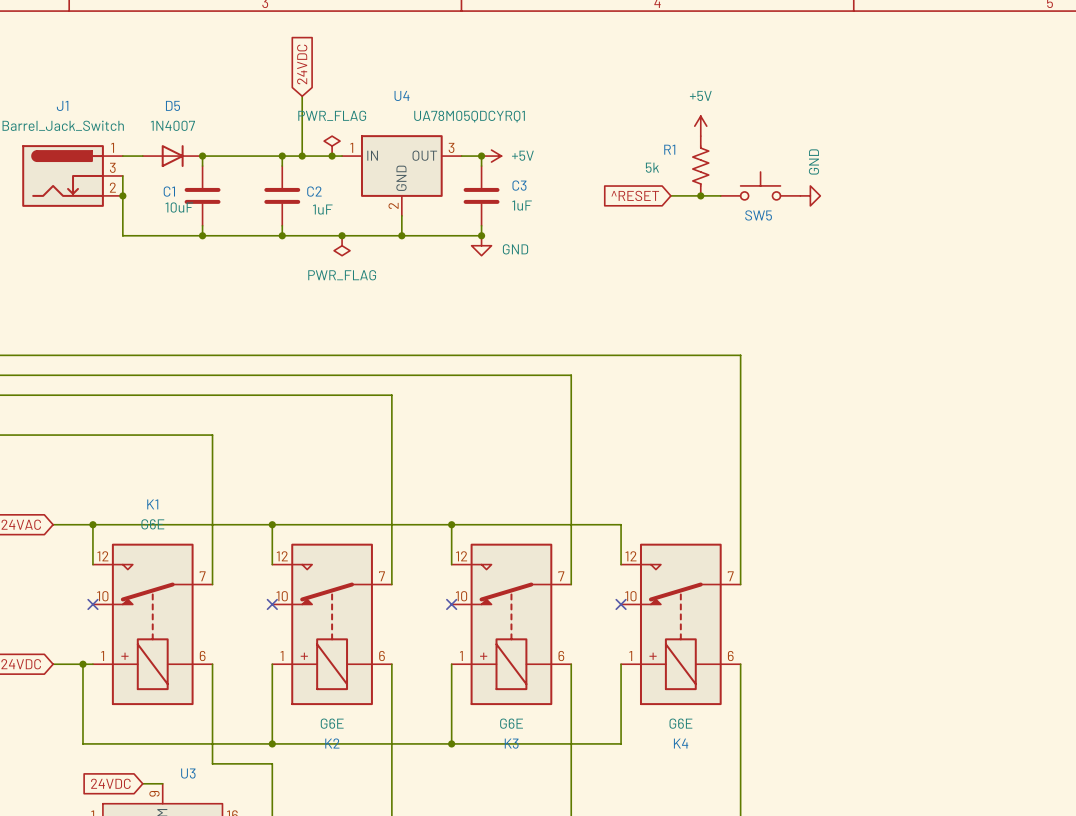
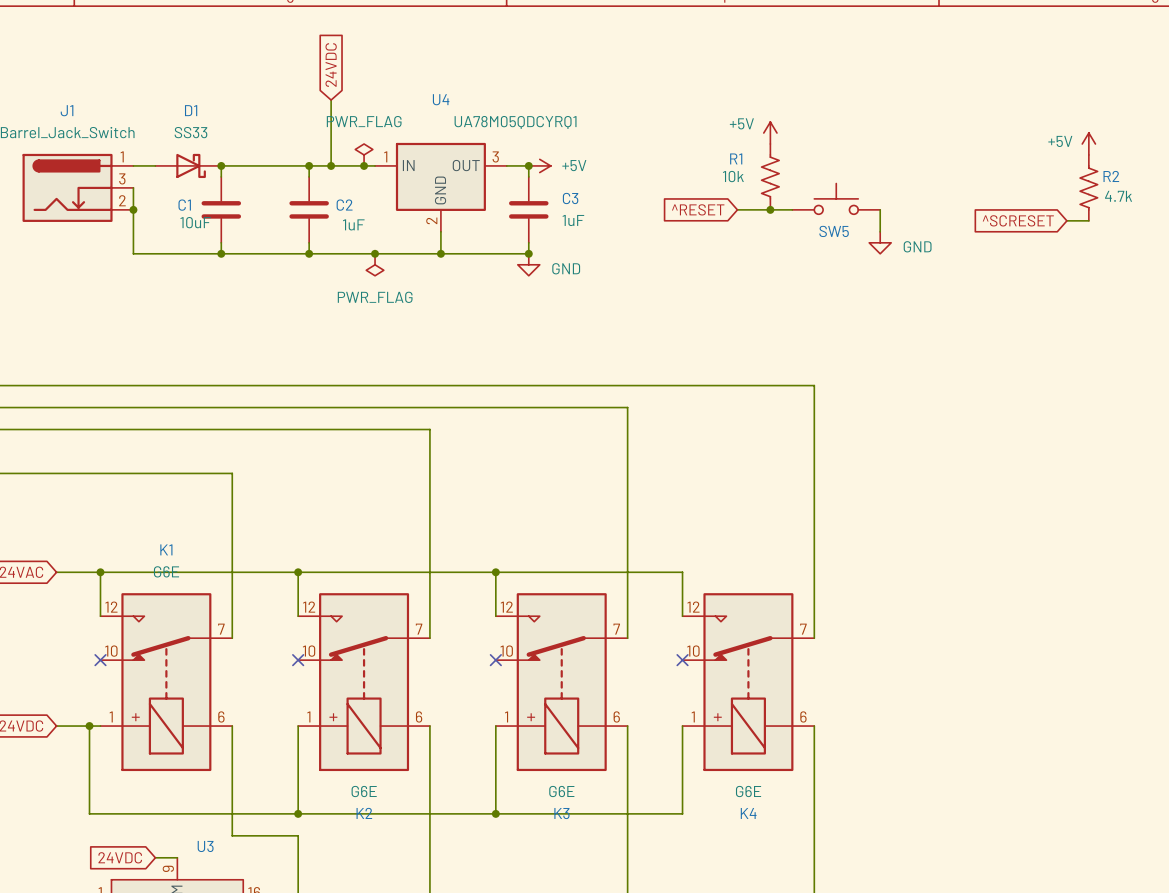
power symbol text position: +5V (700, 95) -> +5V (741, 123)
power symbol: none -> +5V (1088, 143)
D5: 1N4007 (172, 156) -> none
D1: none -> SS33 (188, 165)
R1 value: 5k (652, 167) -> 10k (733, 176)
R2: none -> 4.7k (1088, 187)
wire: none -> (880, 209) (880, 231)
power symbol rotation: 0° (810, 195) -> 90° clockwise (880, 242)
power symbol position: GND (810, 195) -> GND (880, 242)
global label: none -> ^SCRESET (1018, 220)
wire: none -> (1066, 220) (1088, 220)

